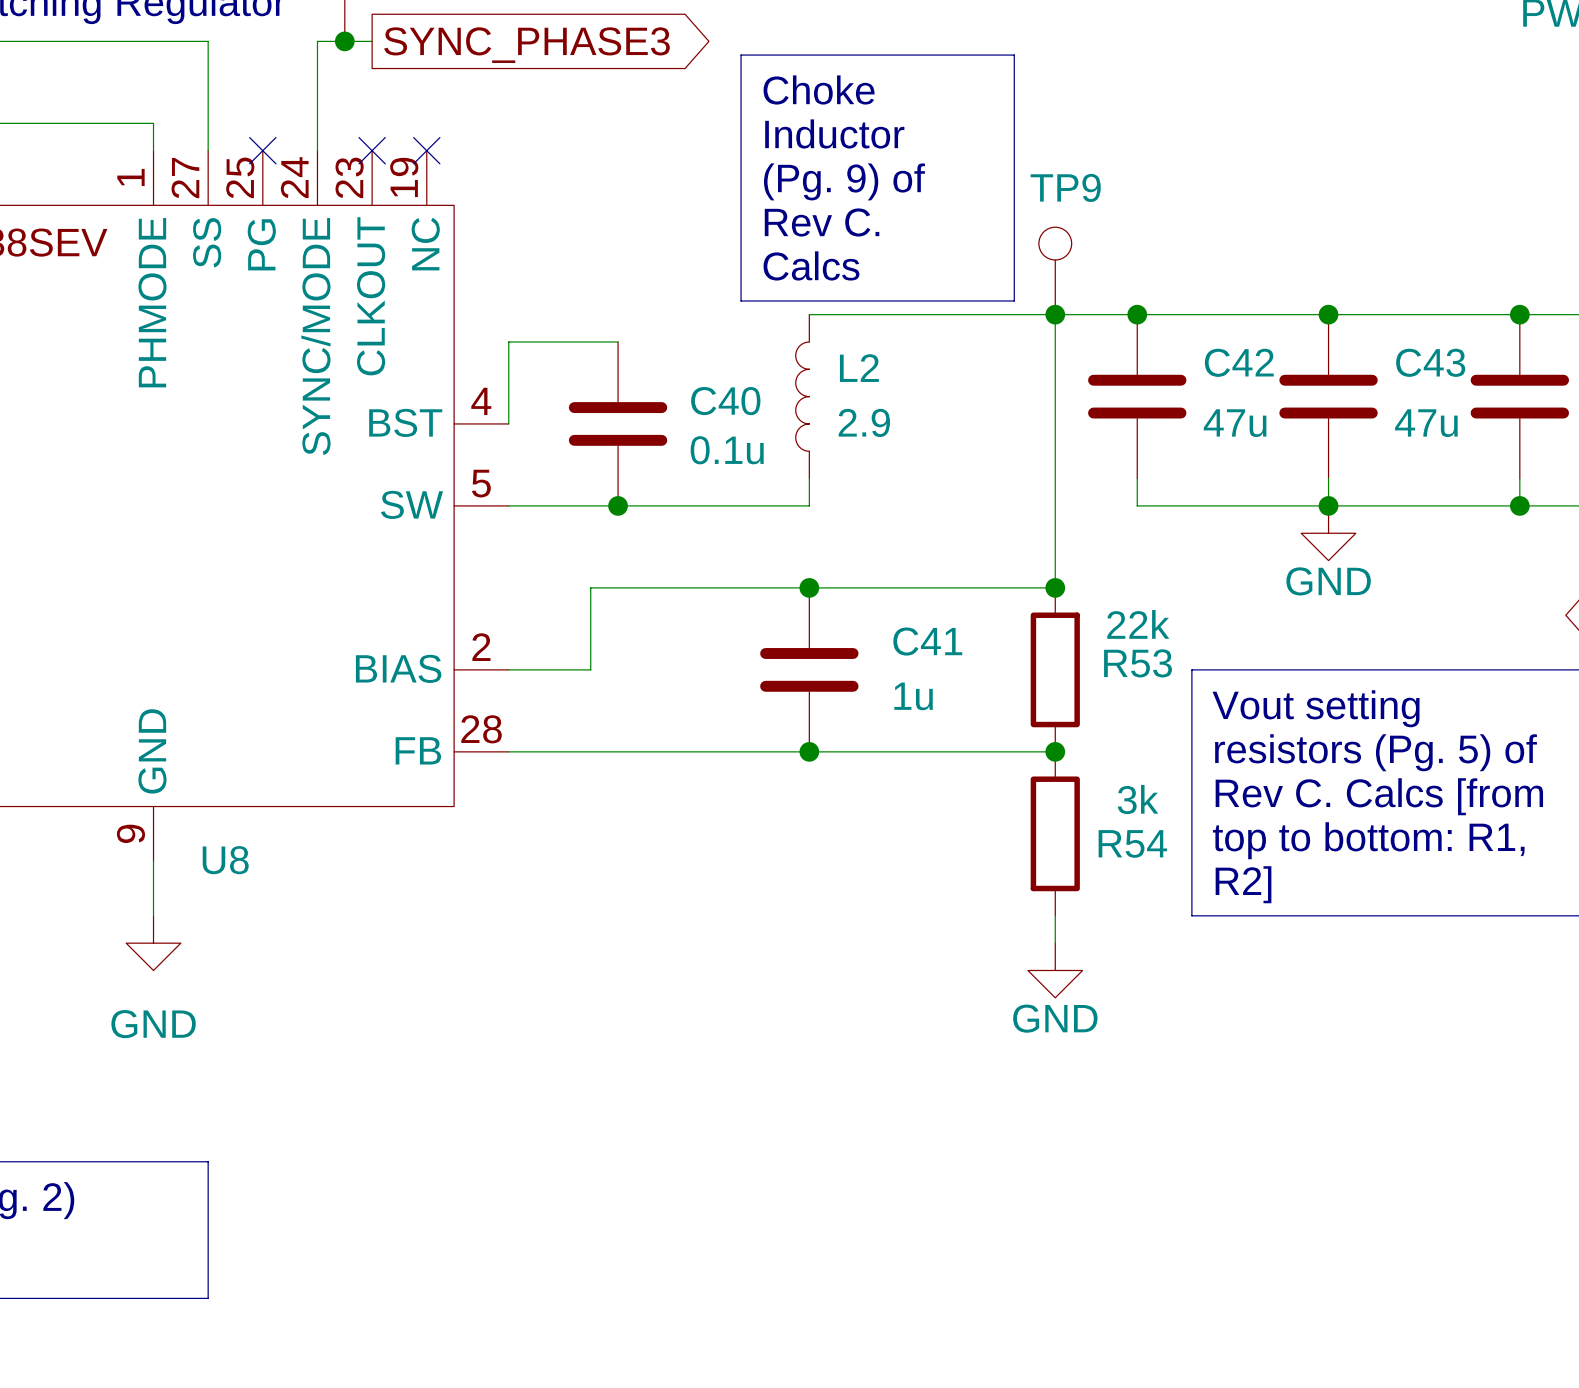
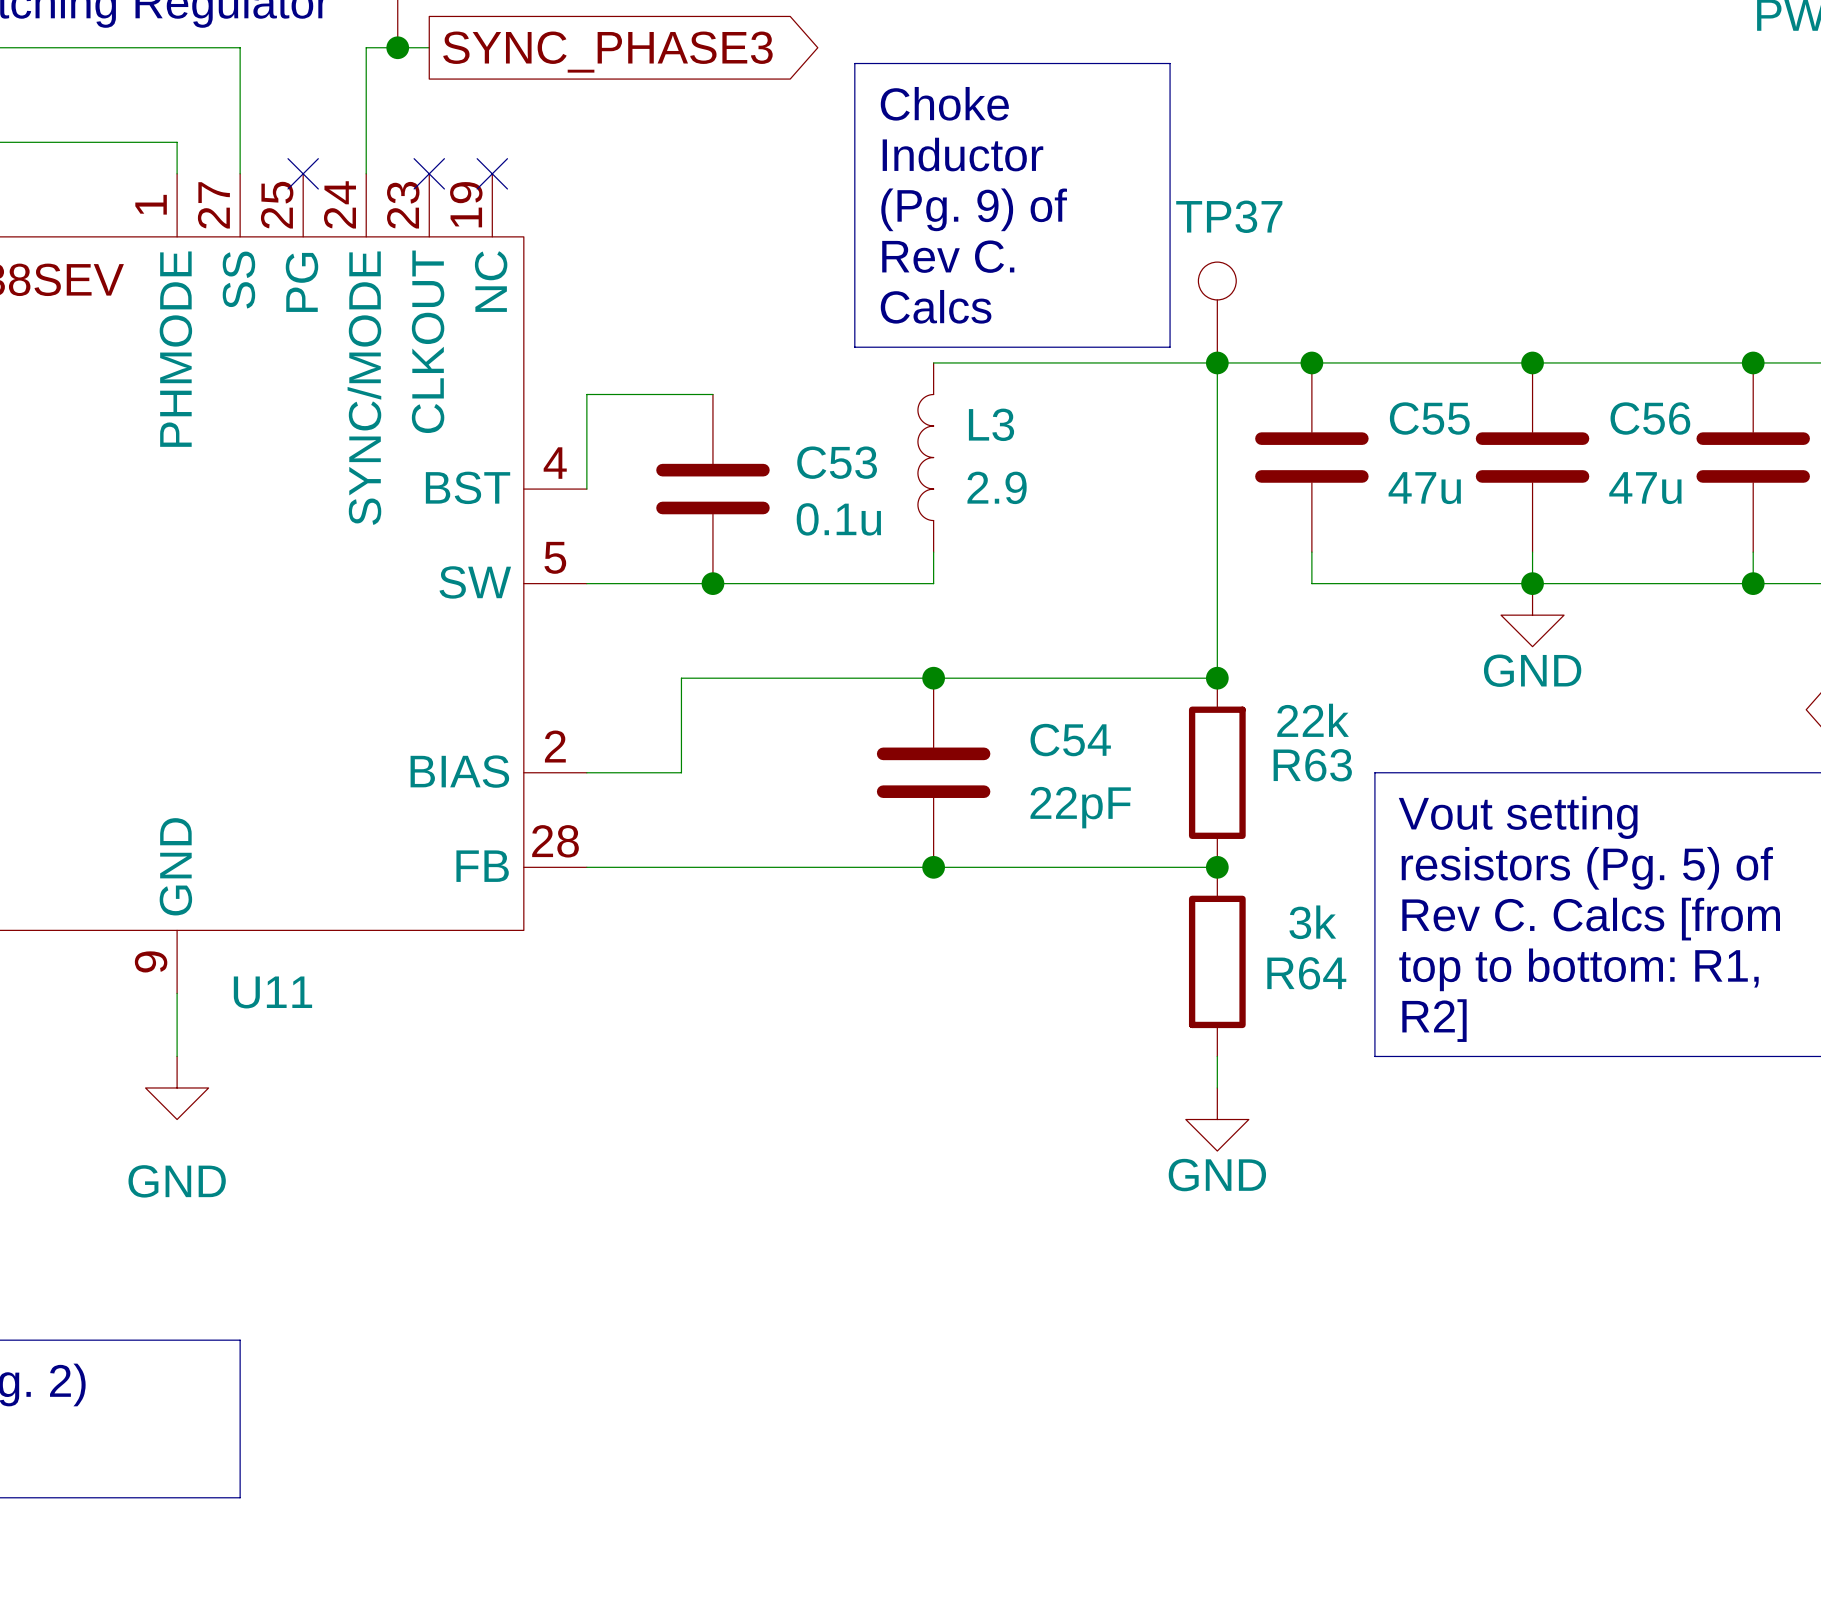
TP9 name: TP9 (1065, 187) -> TP37 (1229, 216)
C42 name: C42 (1239, 362) -> C55 (1429, 418)
C43 name: C43 (1430, 362) -> C56 (1650, 418)
L2 name: L2 (859, 368) -> L3 (991, 424)
C40 name: C40 (725, 401) -> C53 (837, 462)
C41 name: C41 (927, 641) -> C54 (1070, 740)
R53 name: R53 (1138, 663) -> R63 (1312, 765)
C41 value: 1u (913, 696) -> 22pF (1080, 807)
R54 name: R54 (1132, 843) -> R64 (1306, 973)
U8 name: U8 (225, 860) -> U11 (272, 992)

